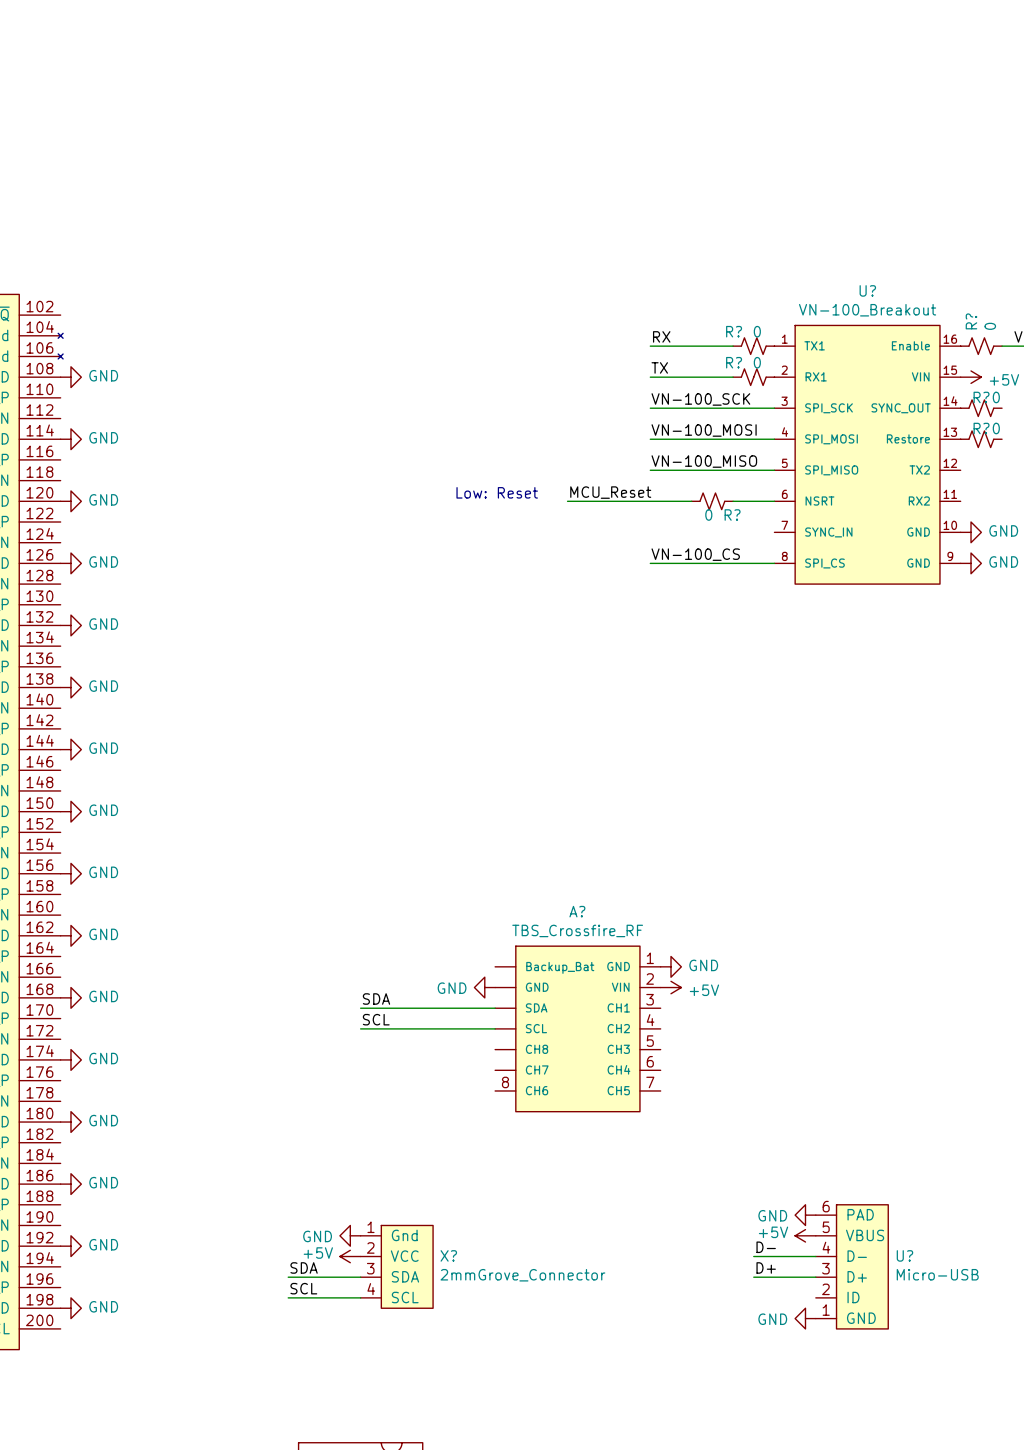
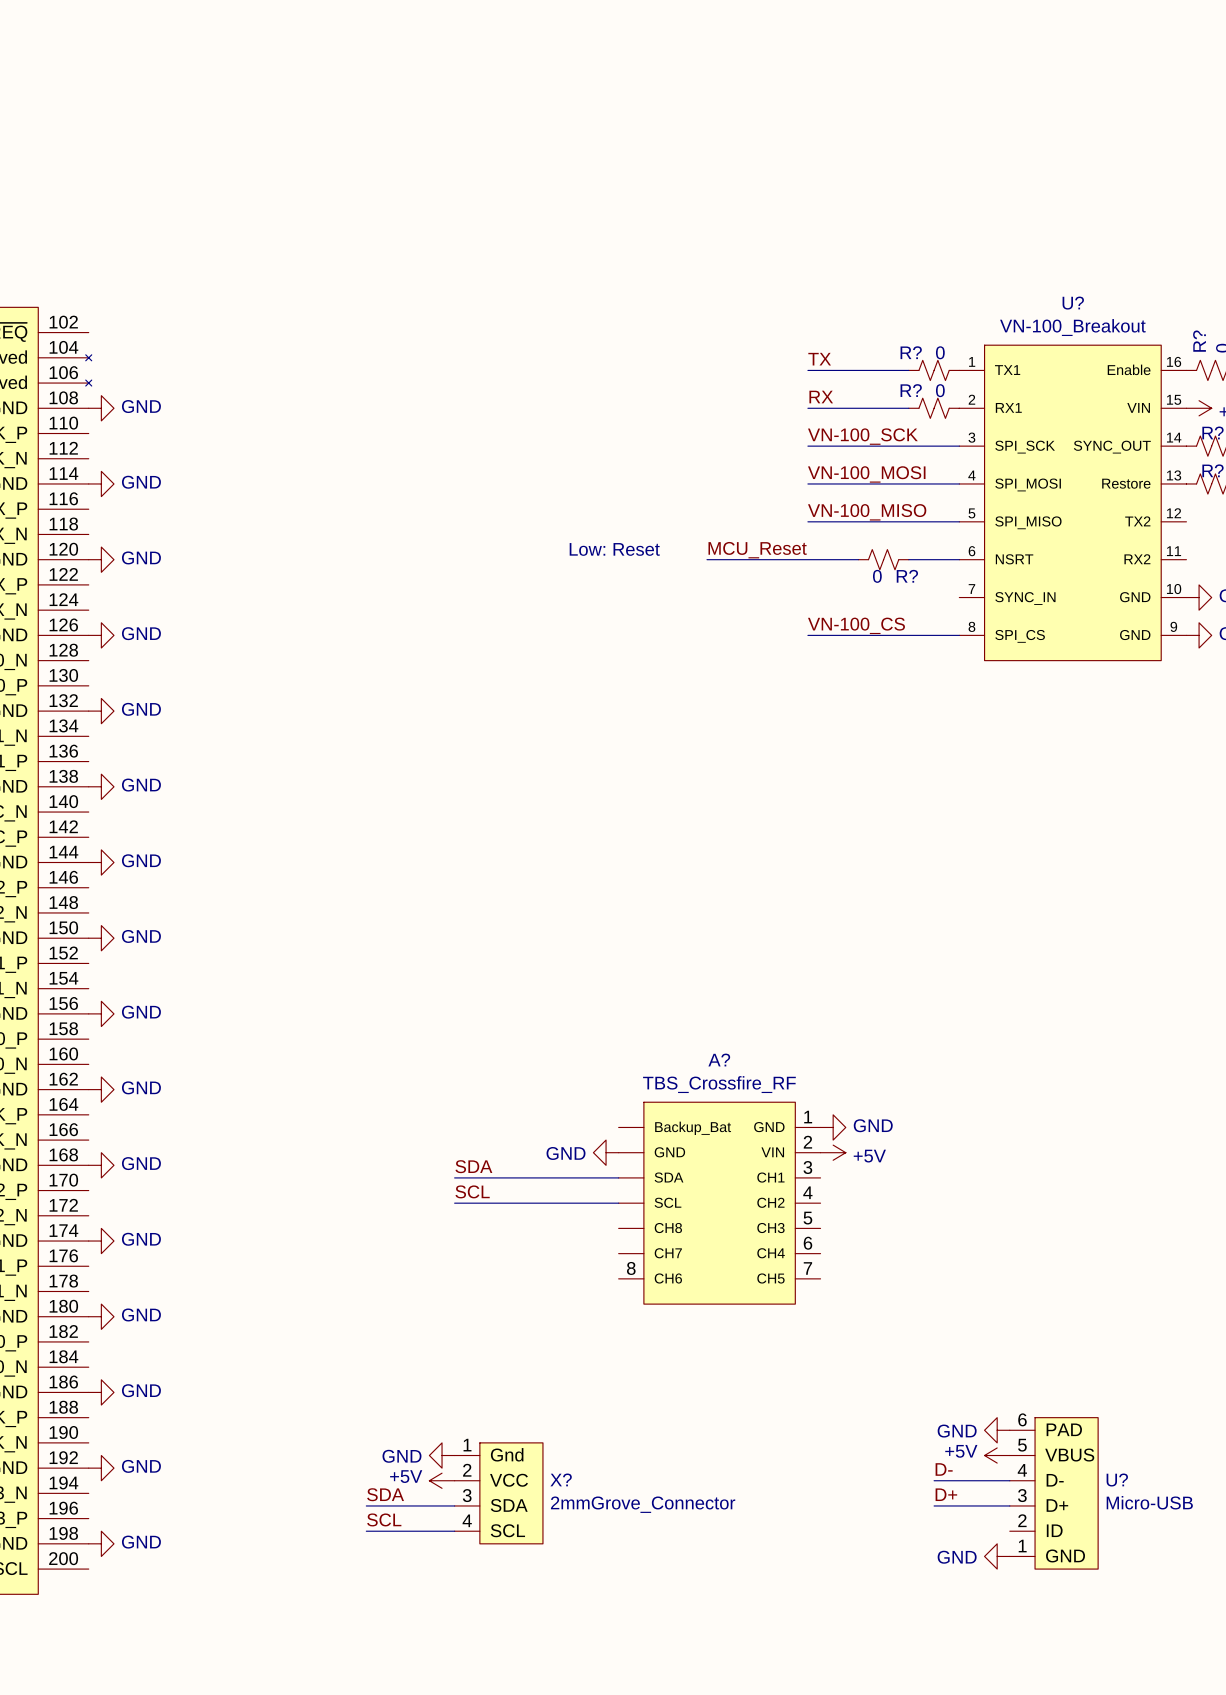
label: RX (661, 336) -> TX (819, 359)
label: TX (659, 367) -> RX (821, 397)

